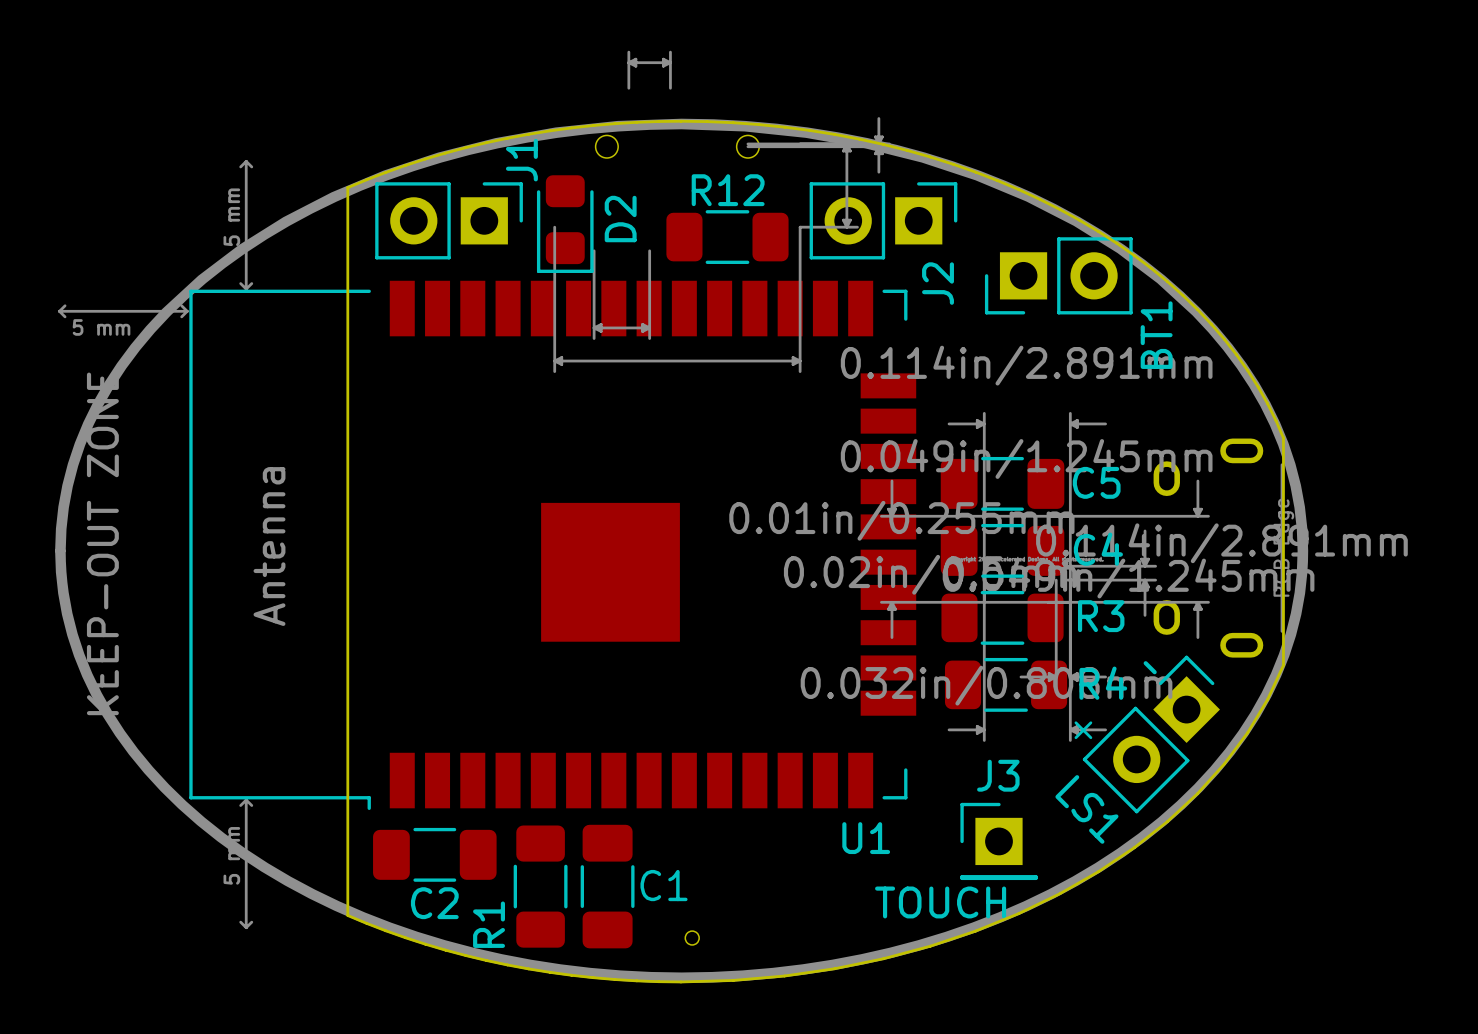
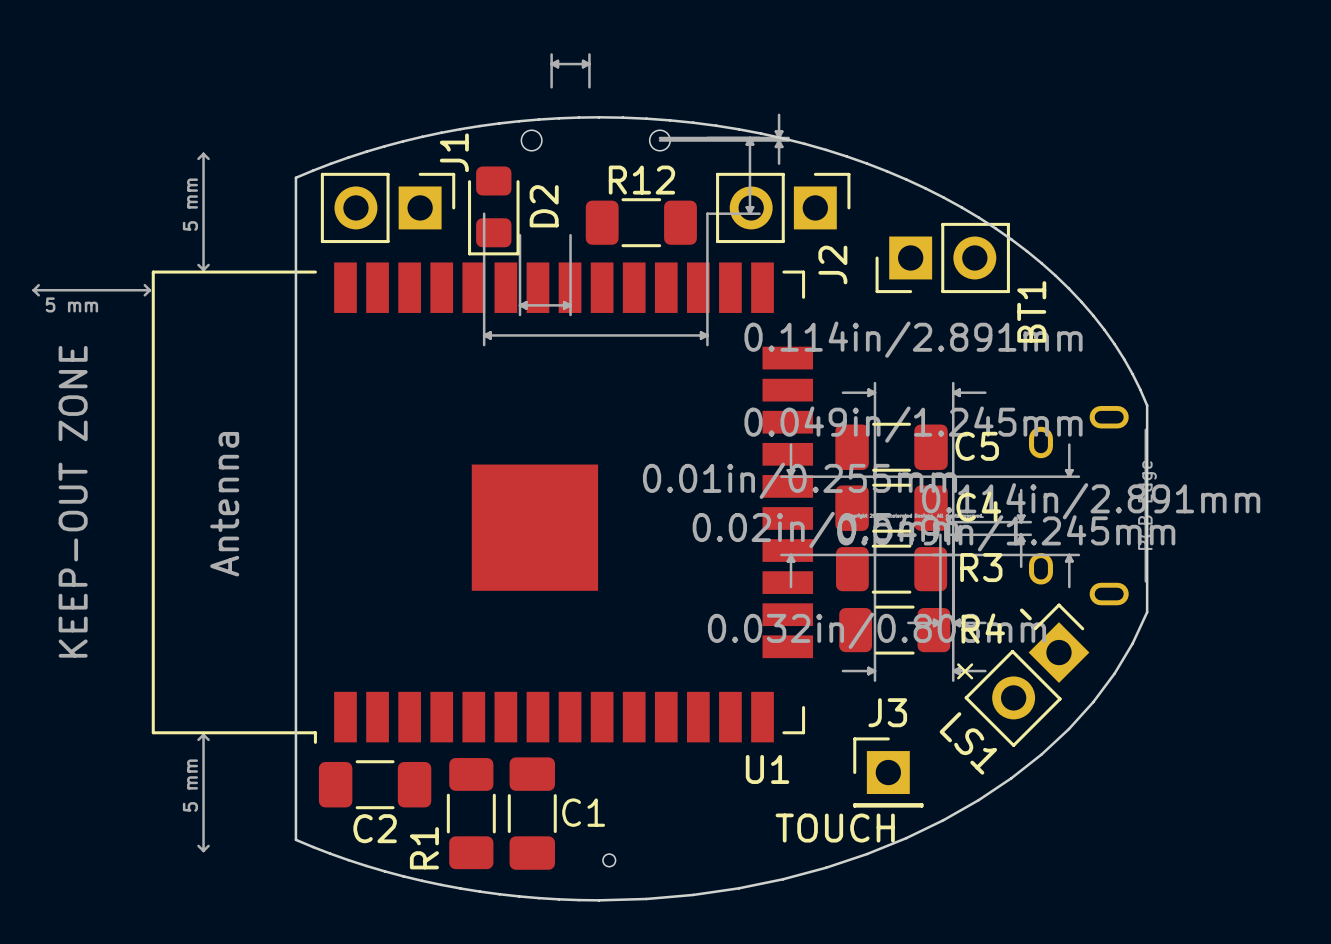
drawing: [55, 118, 1309, 984] -> none

